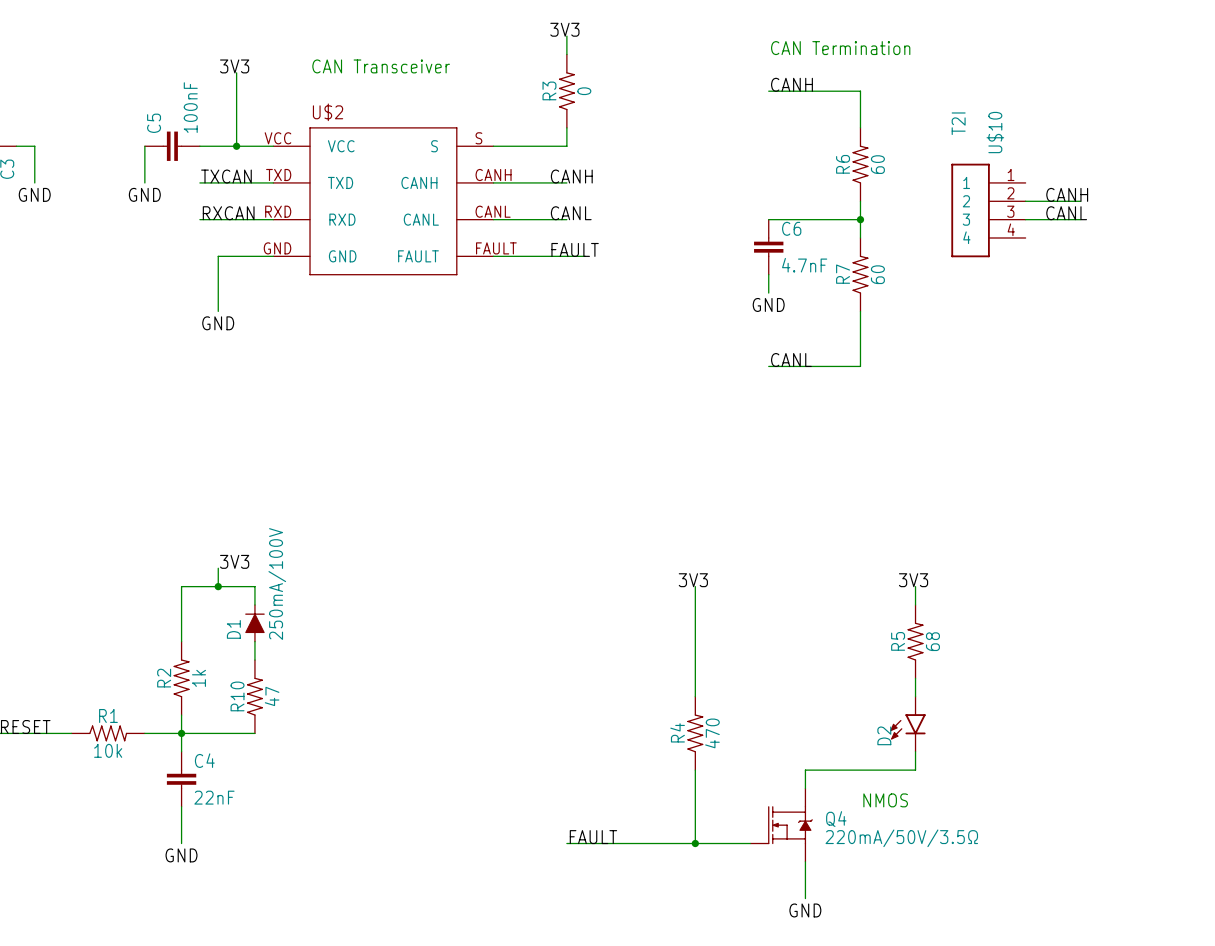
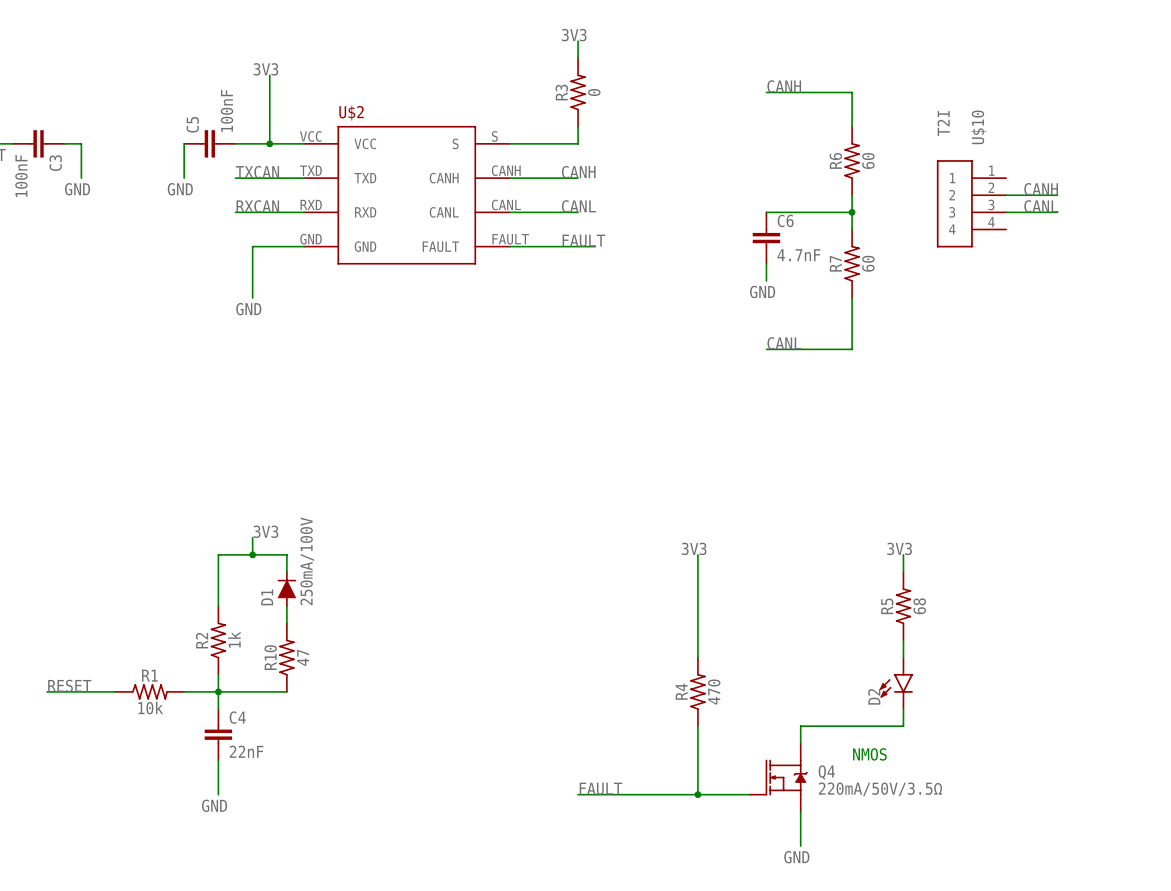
text: CAN Termination (840, 48) -> none
text: CAN Transceiver (381, 66) -> none

